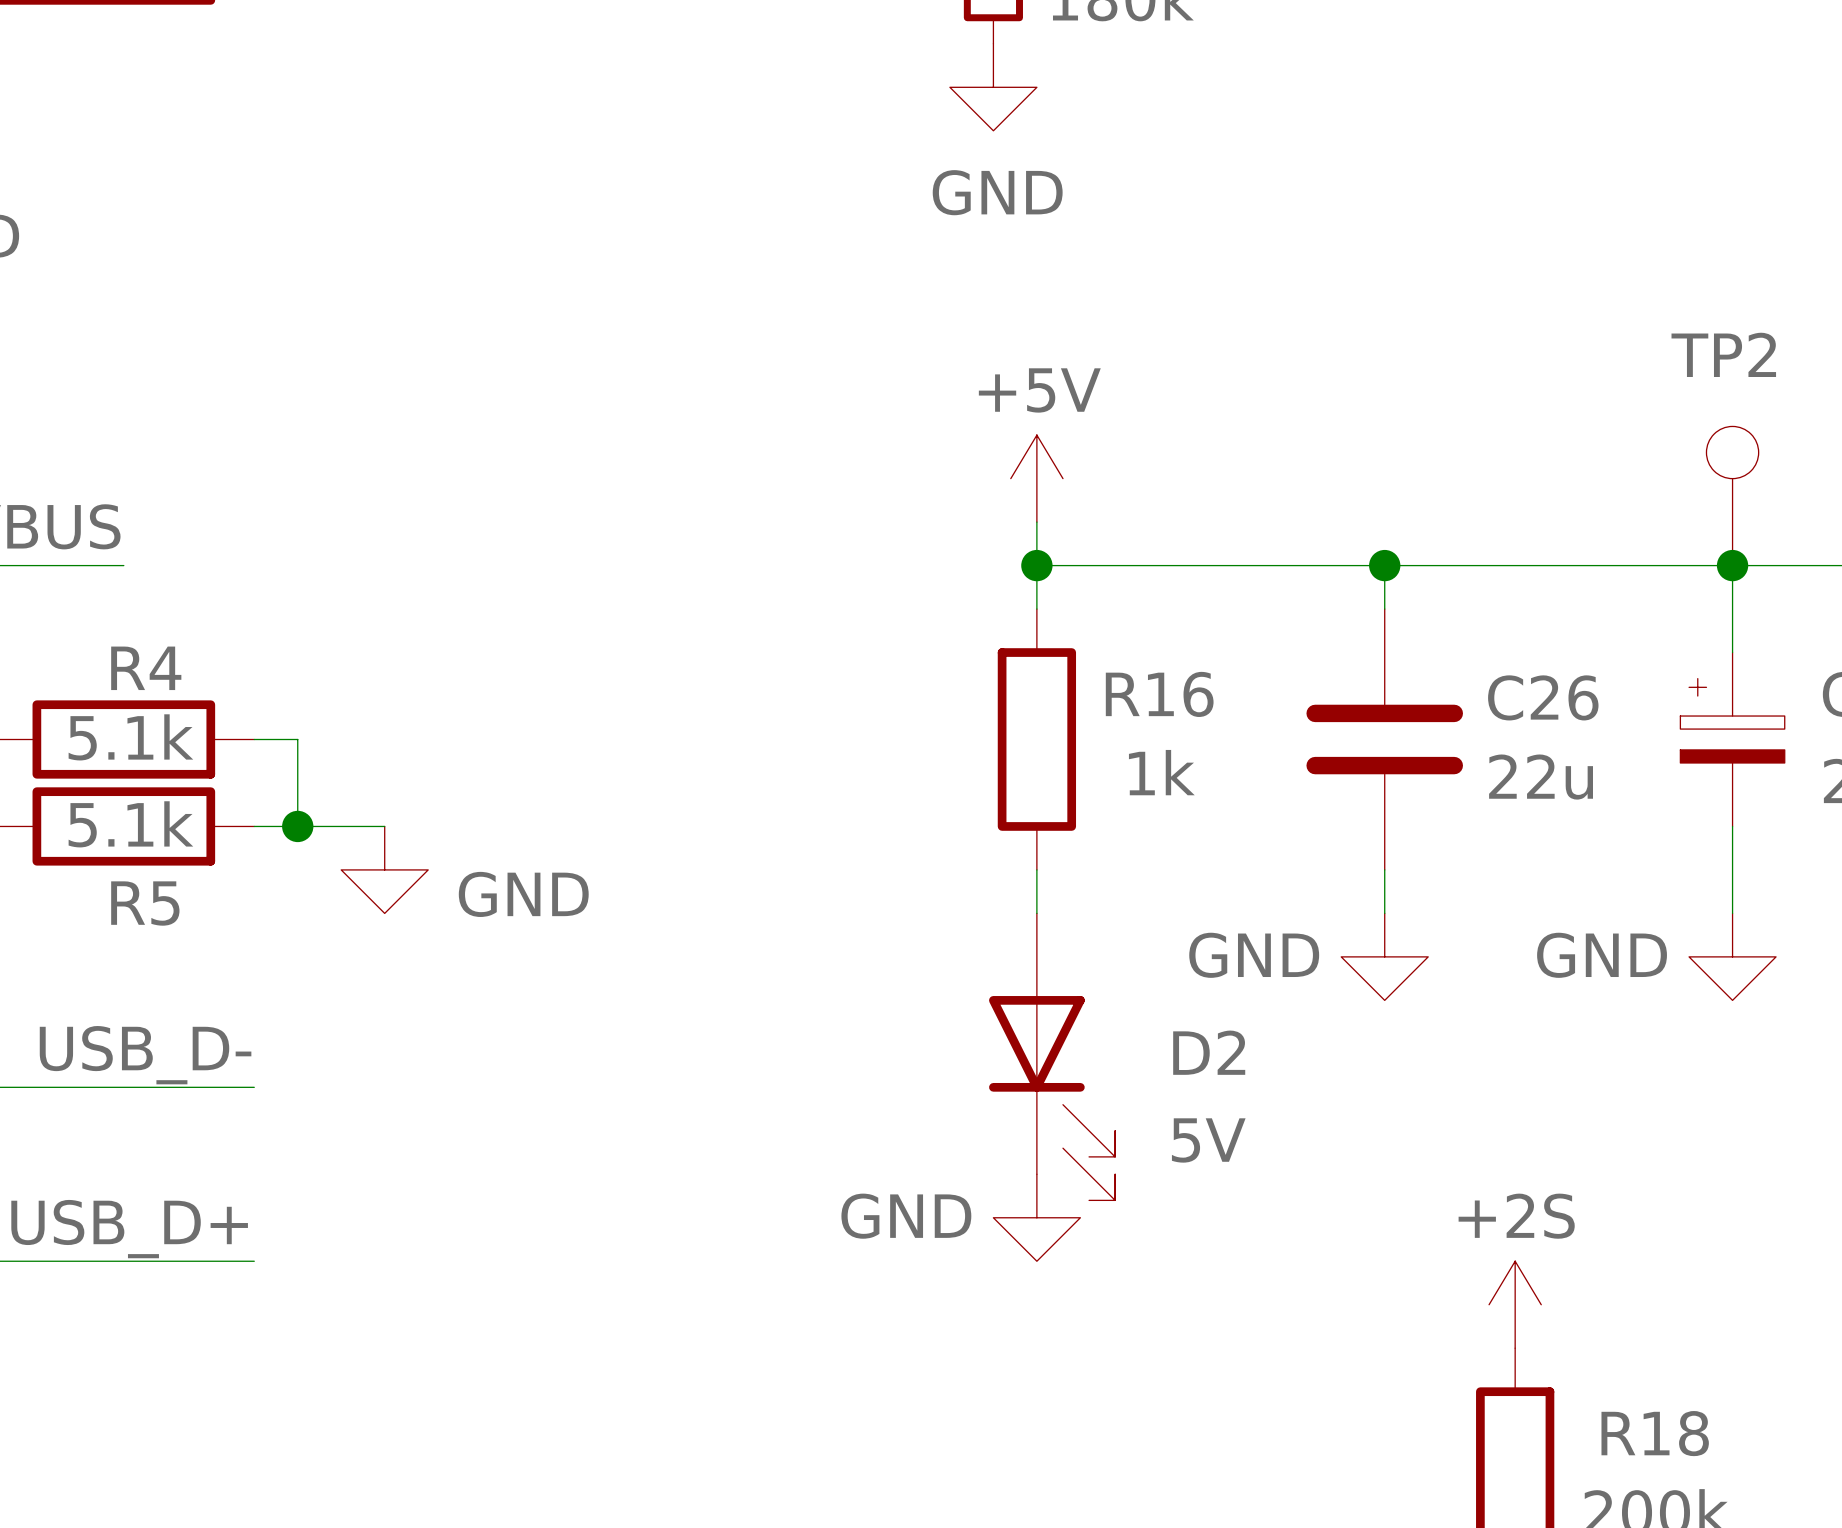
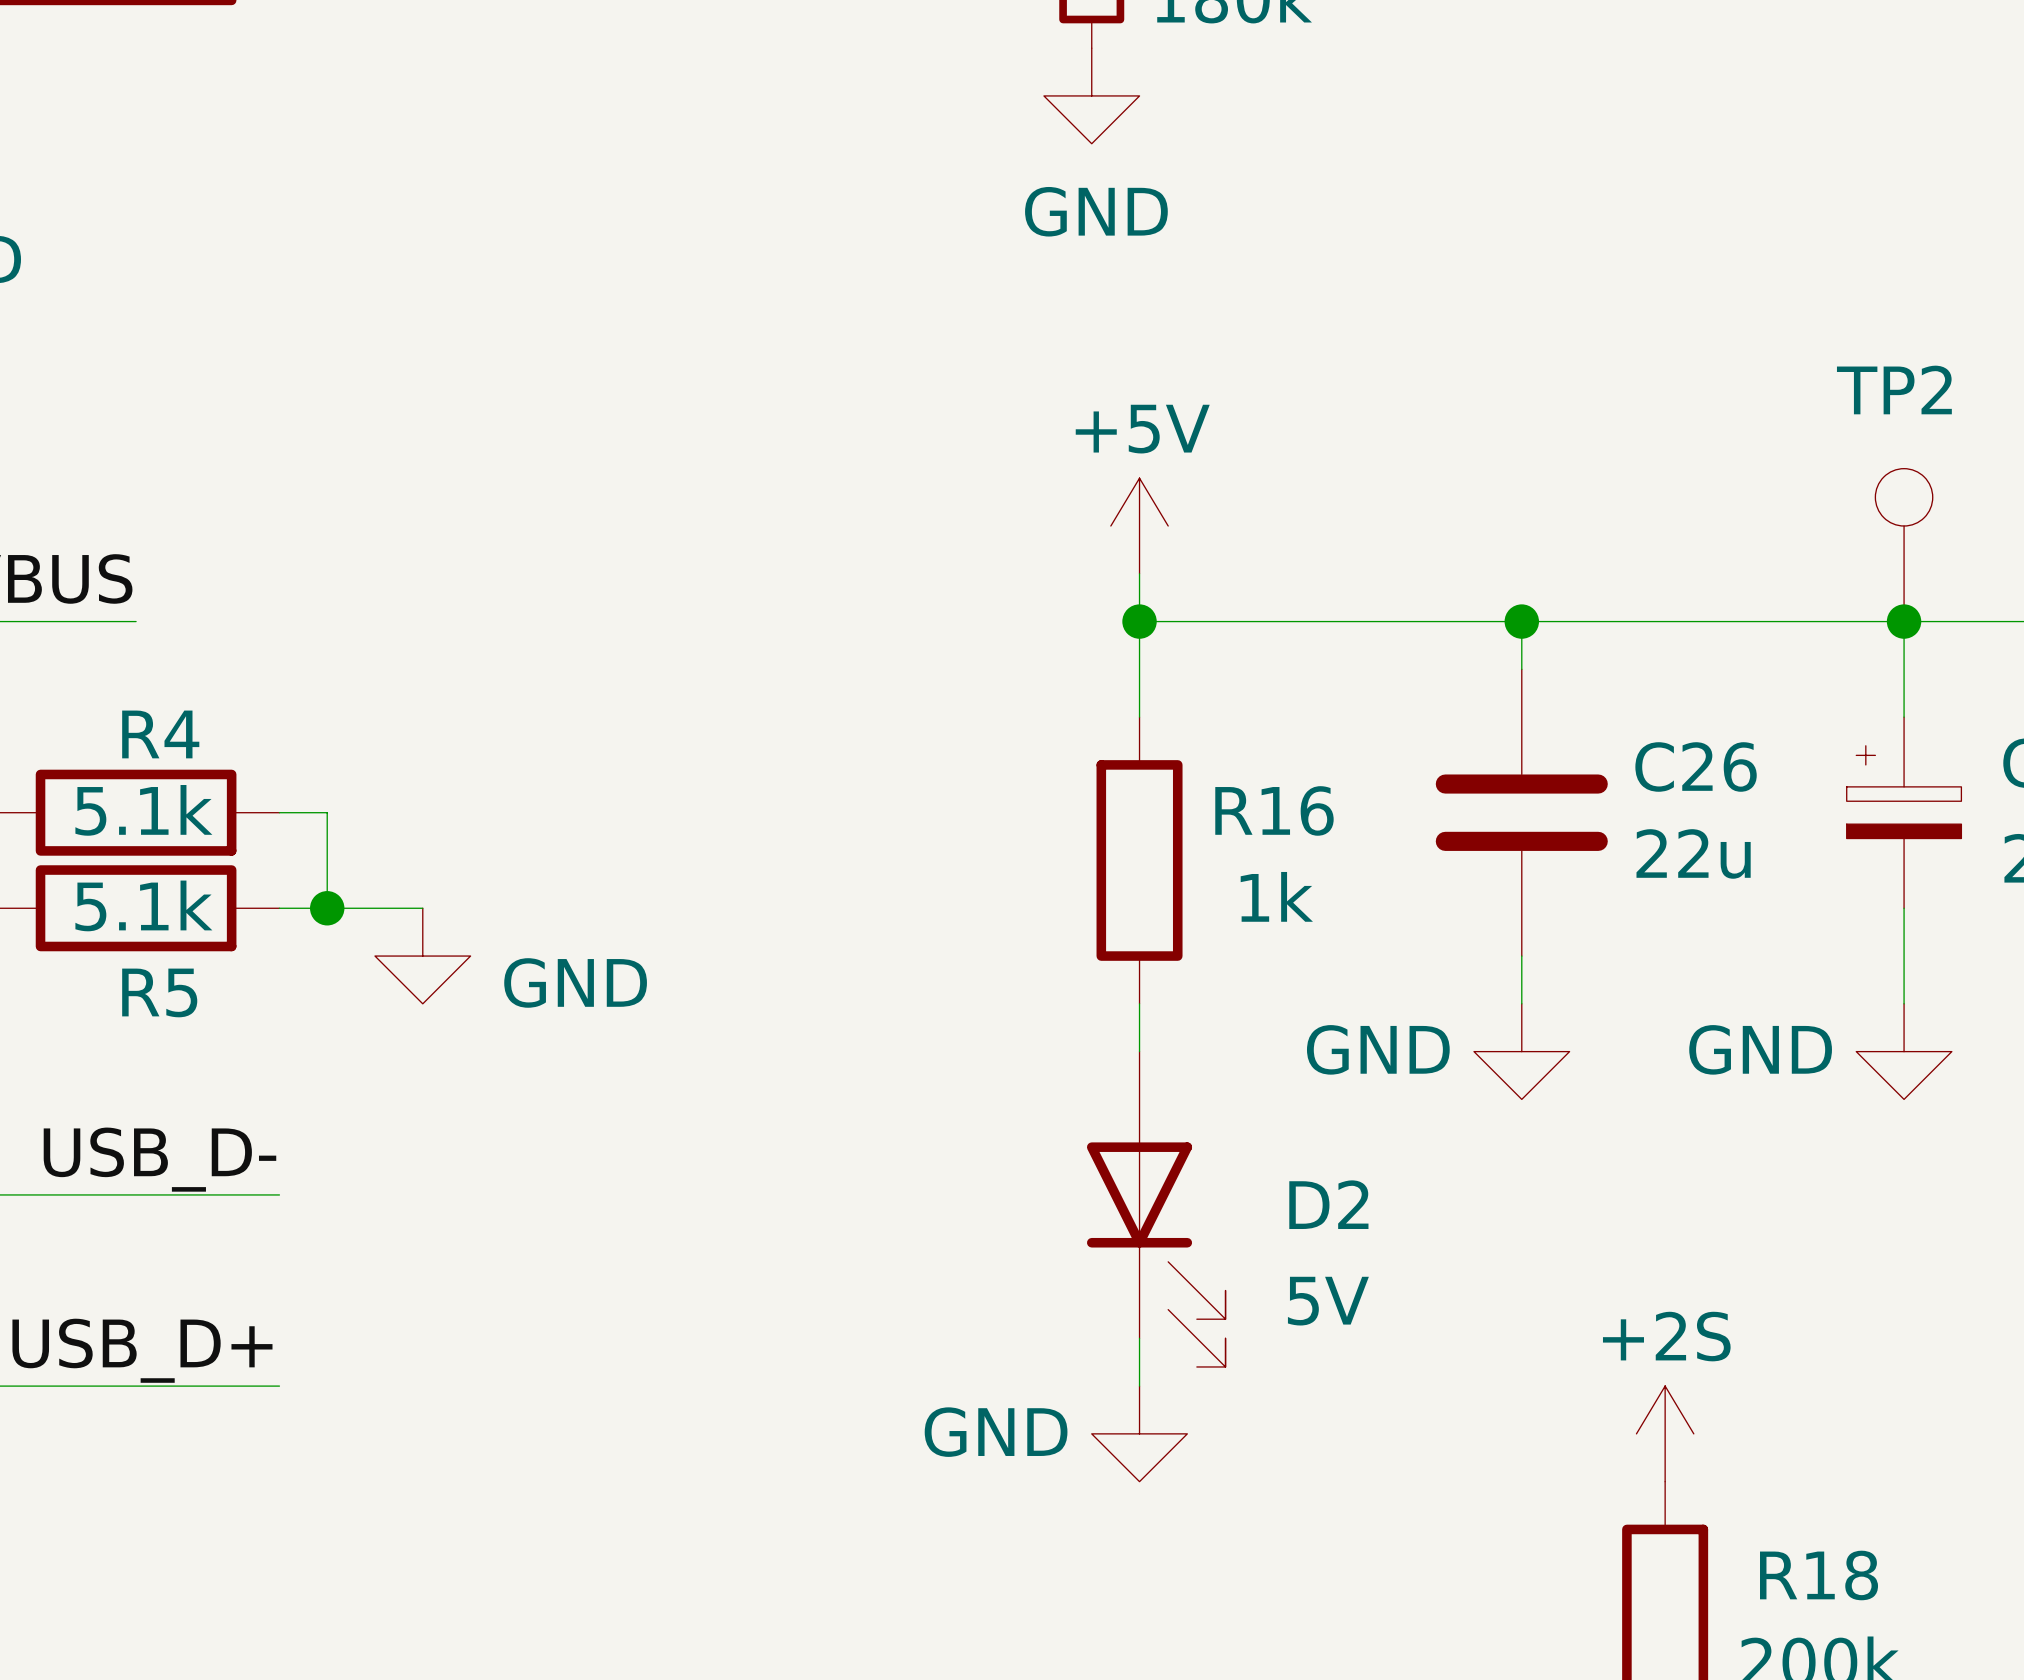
R16 position: (1036, 739) -> (1139, 860)
D2 position: (1052, 1056) -> (1156, 1209)
wire: none -> (1139, 1338) (1139, 1386)
power symbol position: GND (1036, 1217) -> GND (1139, 1433)

